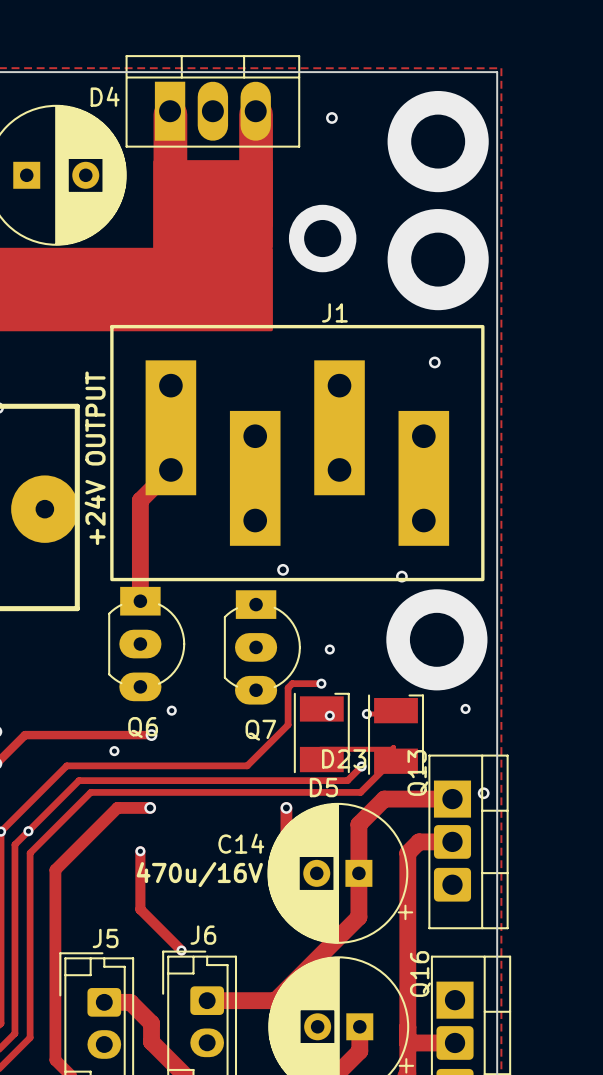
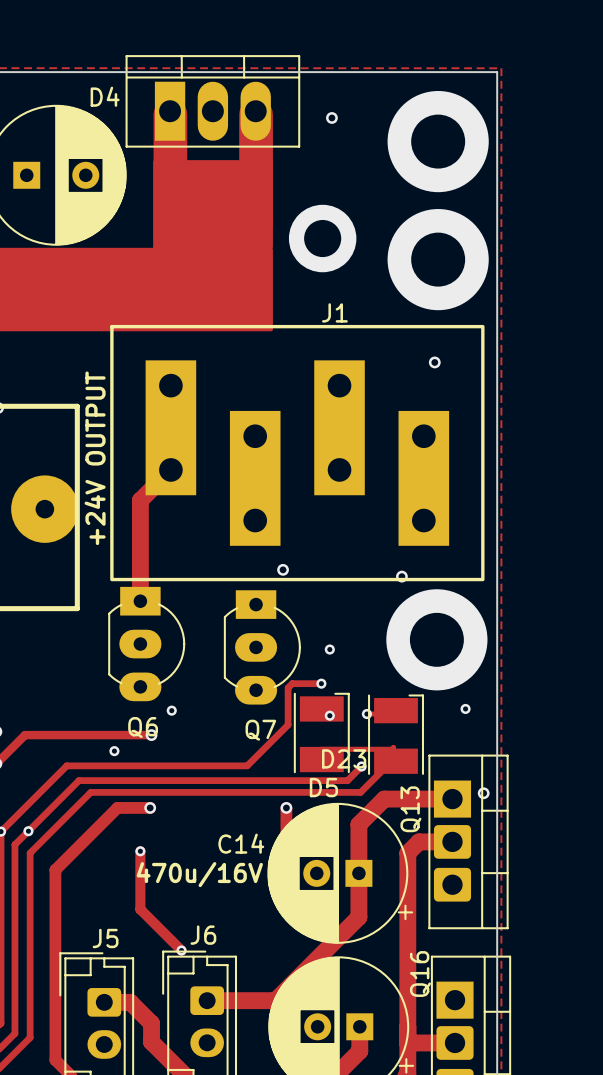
Q13 name position: Q13 (417, 772) -> Q13 (410, 809)

